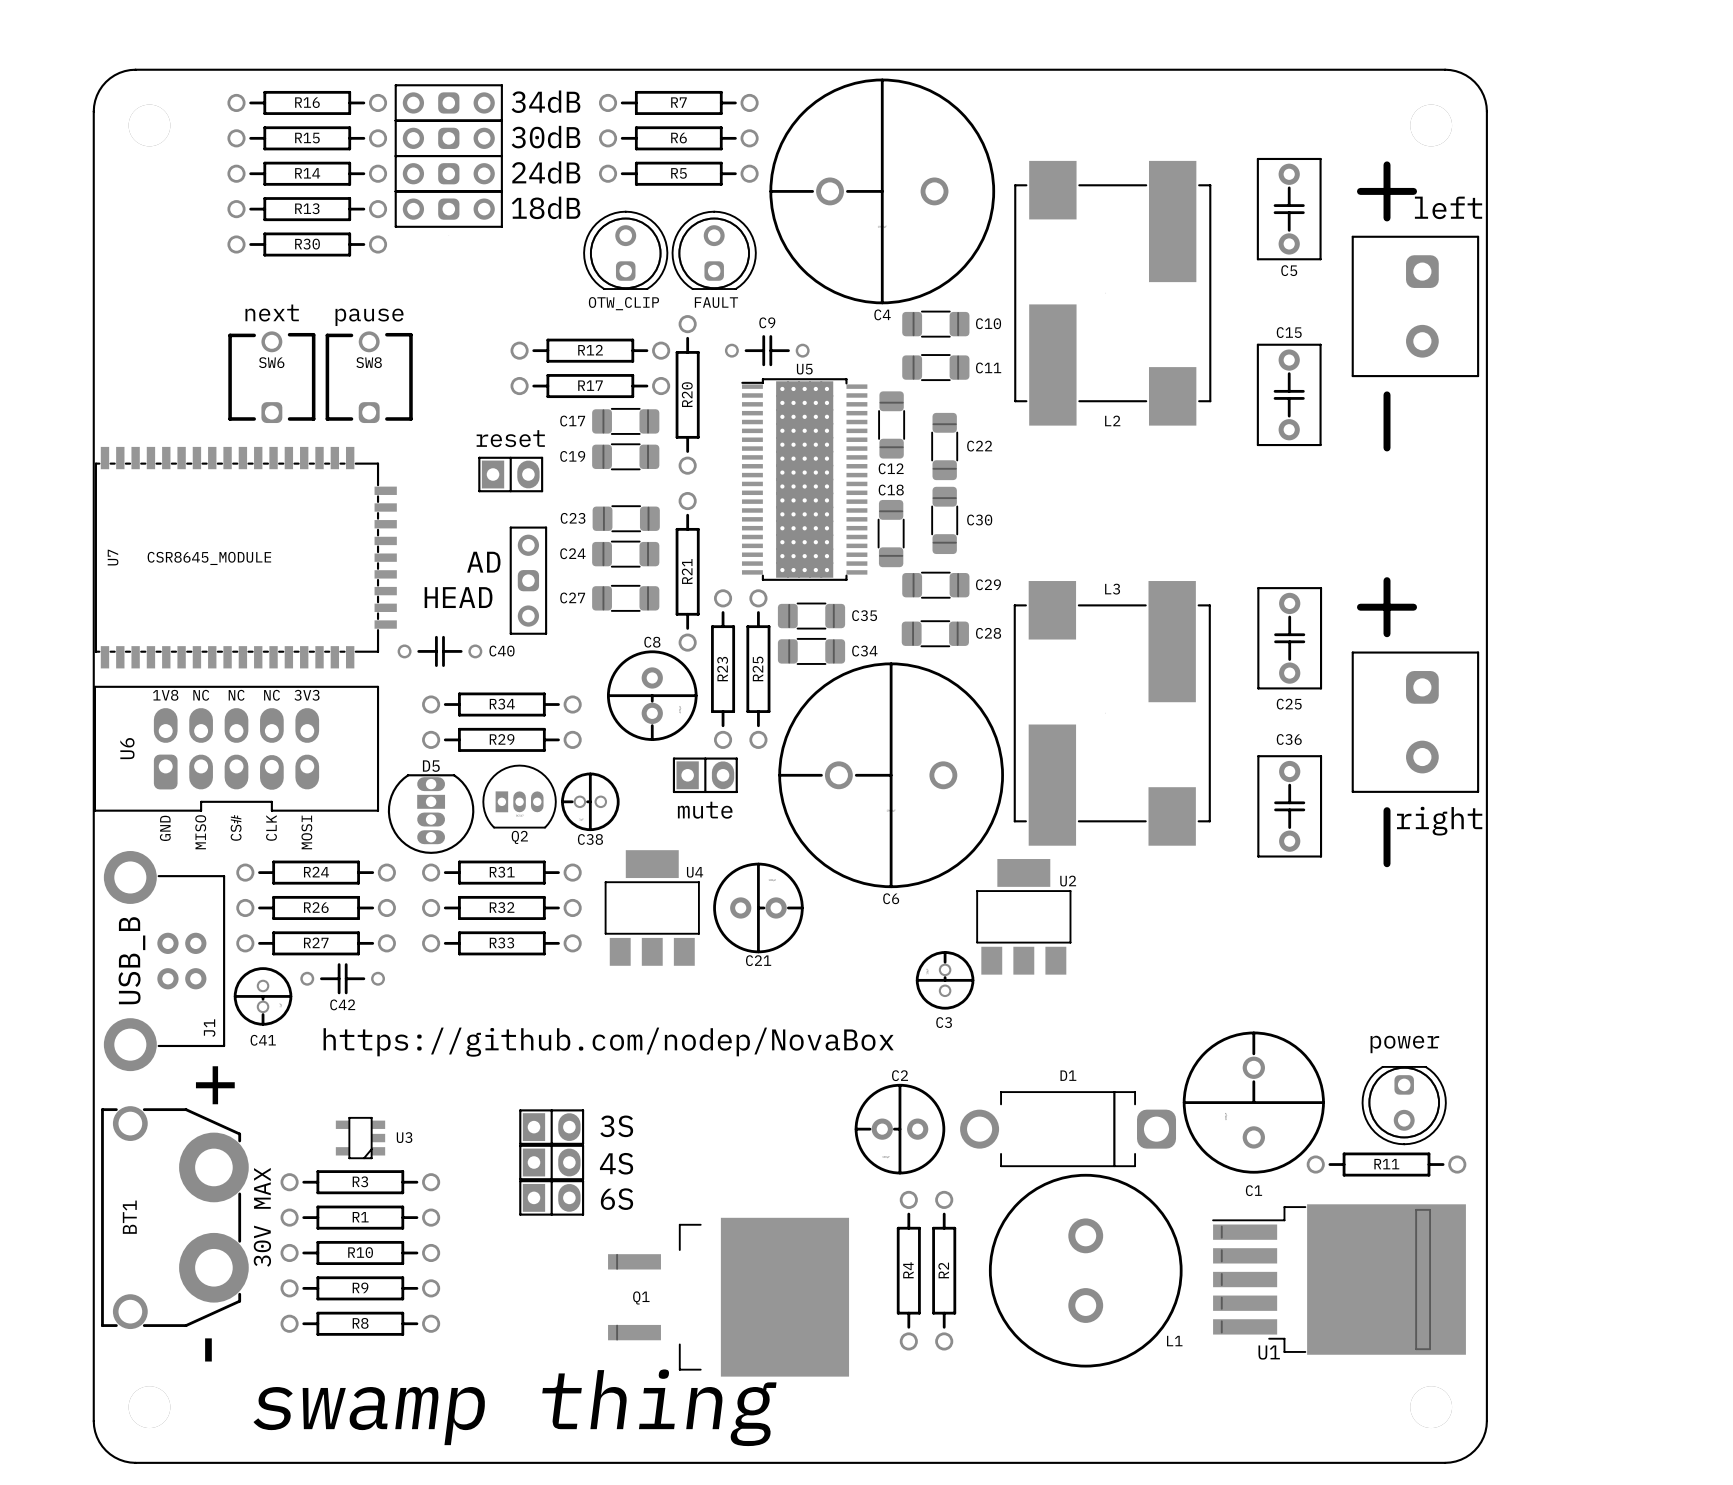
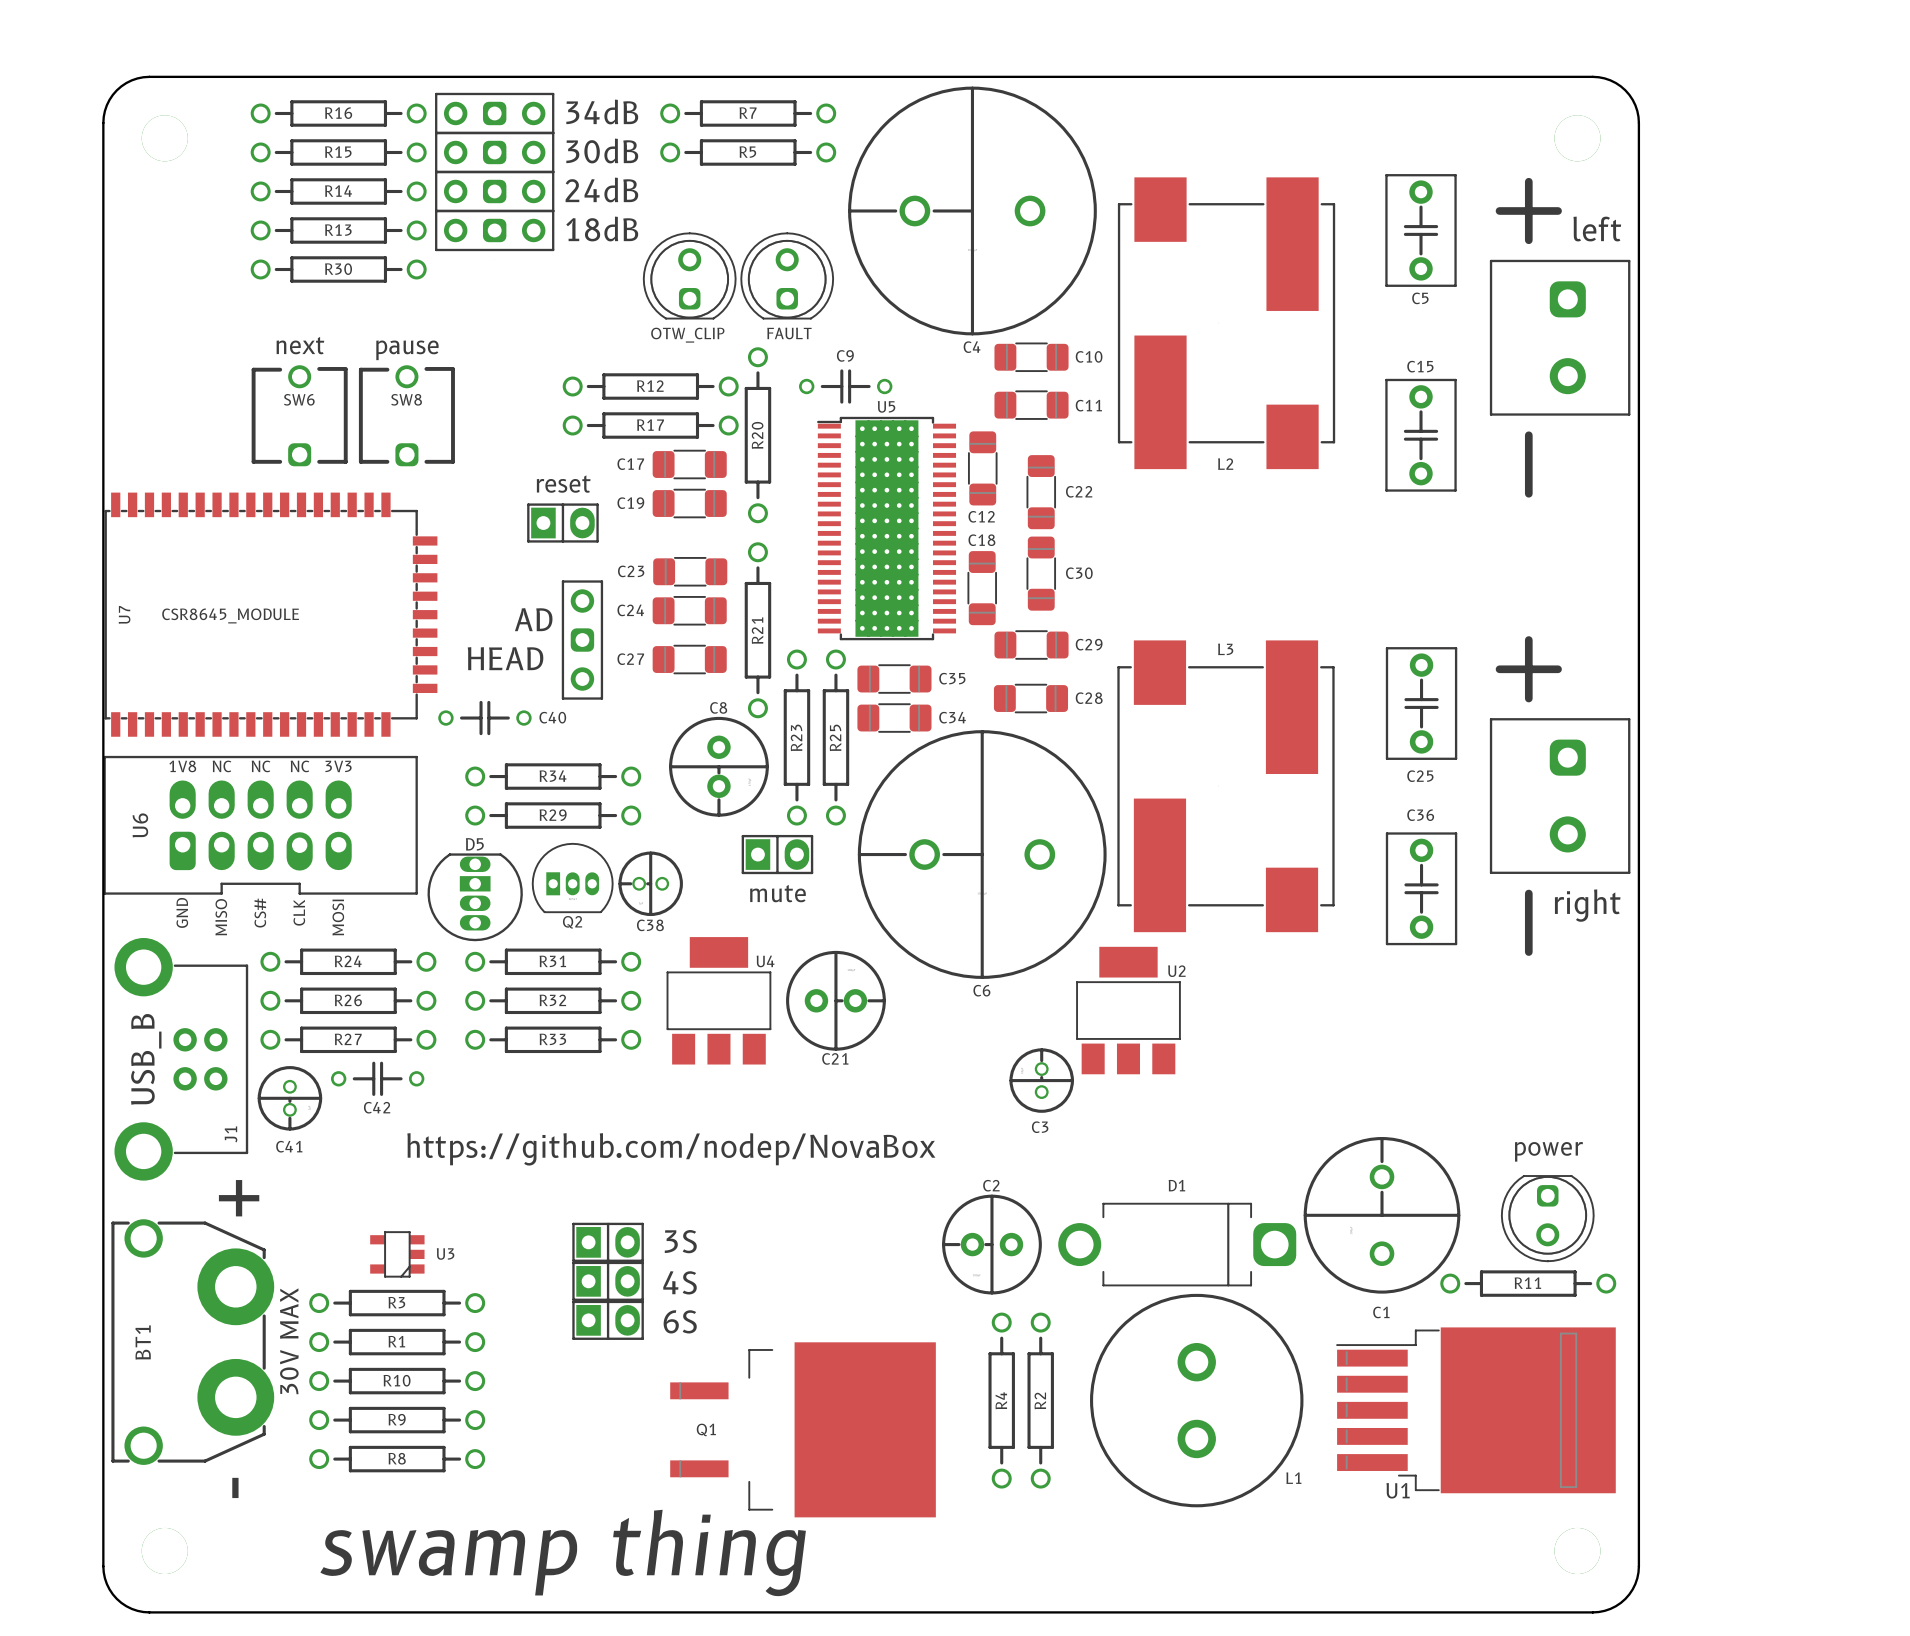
R6 name: R6 (679, 138) -> R5 (747, 152)
R5: (678, 173) -> none

